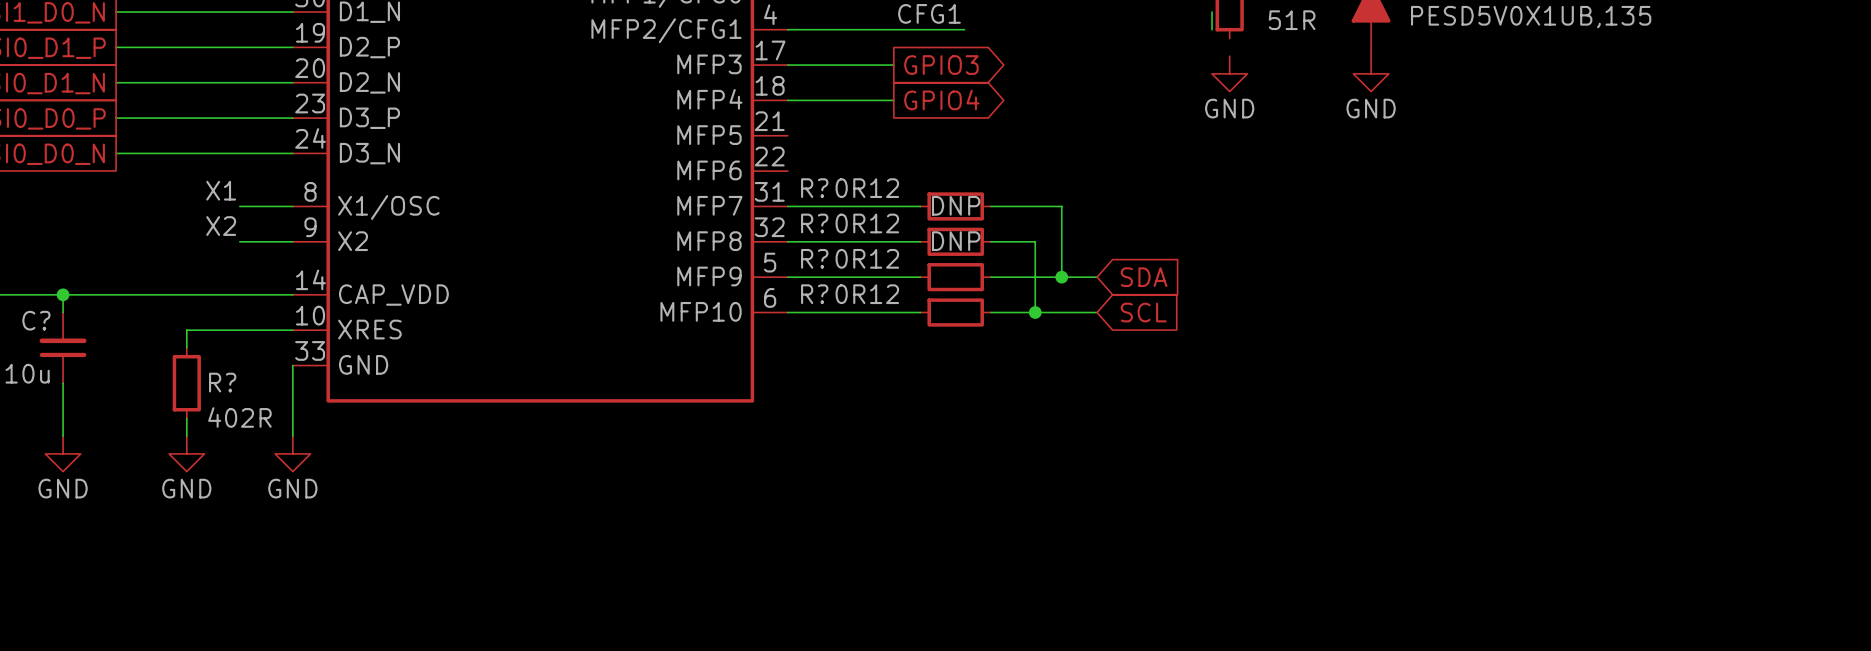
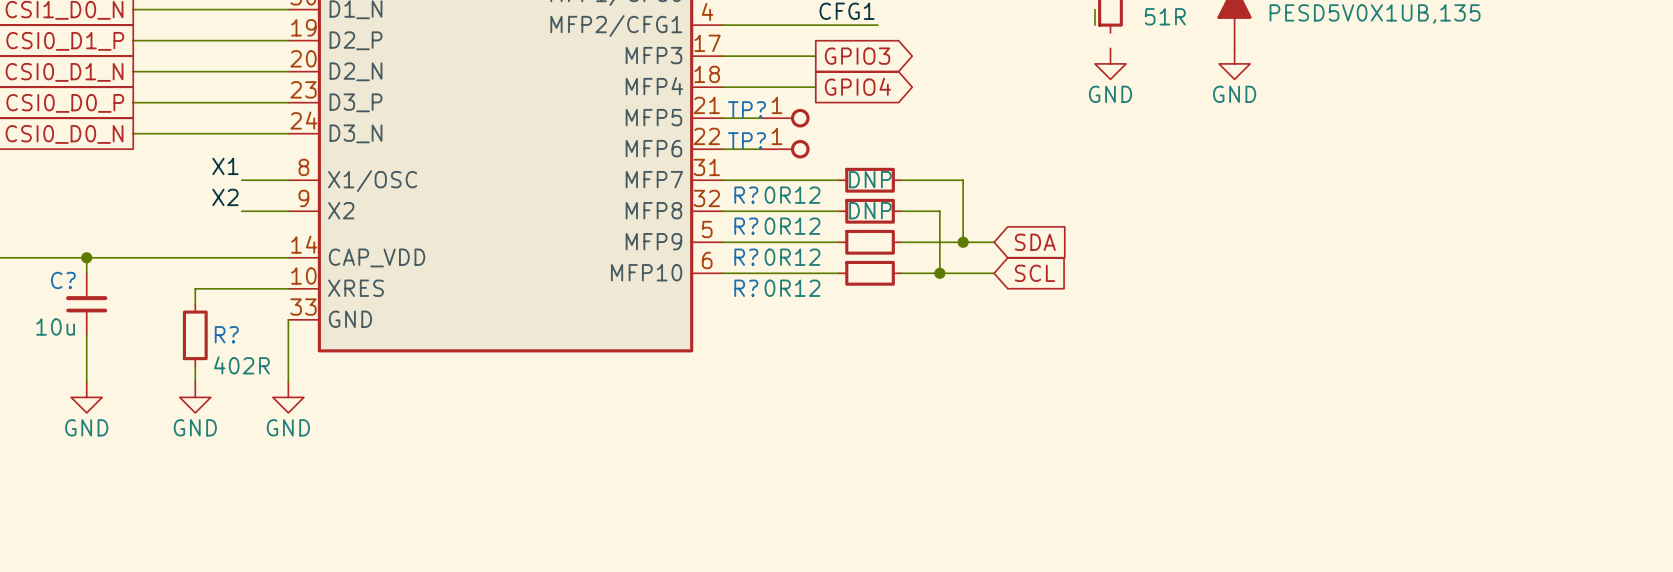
wire: none -> (722, 118) (761, 118)
TP?: none -> (785, 118)
wire: none -> (722, 149) (761, 149)
TP?: none -> (785, 149)
R? name position: R? (814, 188) -> R? (746, 195)
R? text position: 0R12 (867, 188) -> 0R12 (792, 195)
R? name position: R? (814, 294) -> R? (746, 288)
R? text position: 0R12 (867, 294) -> 0R12 (792, 288)

